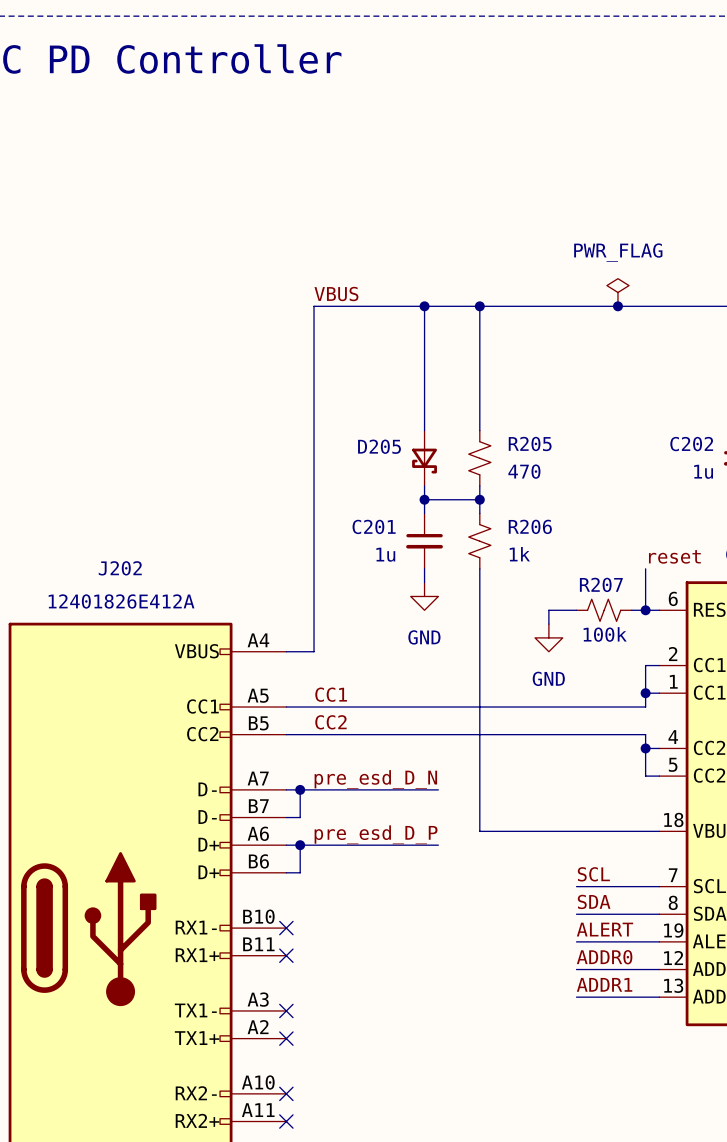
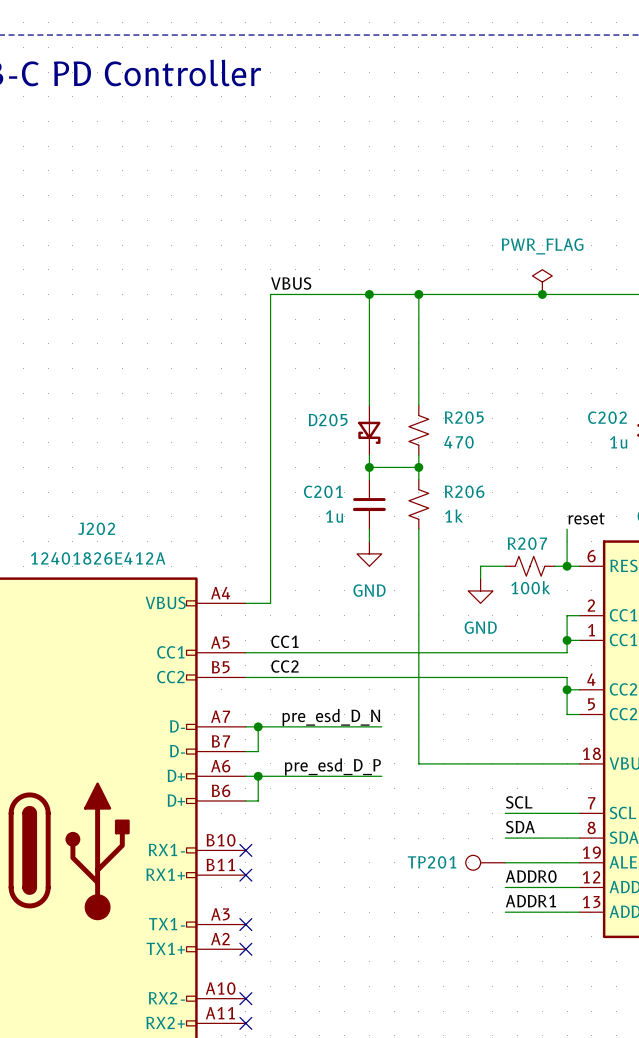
label: ALERT (605, 929) -> none
TP201: none -> (485, 862)

